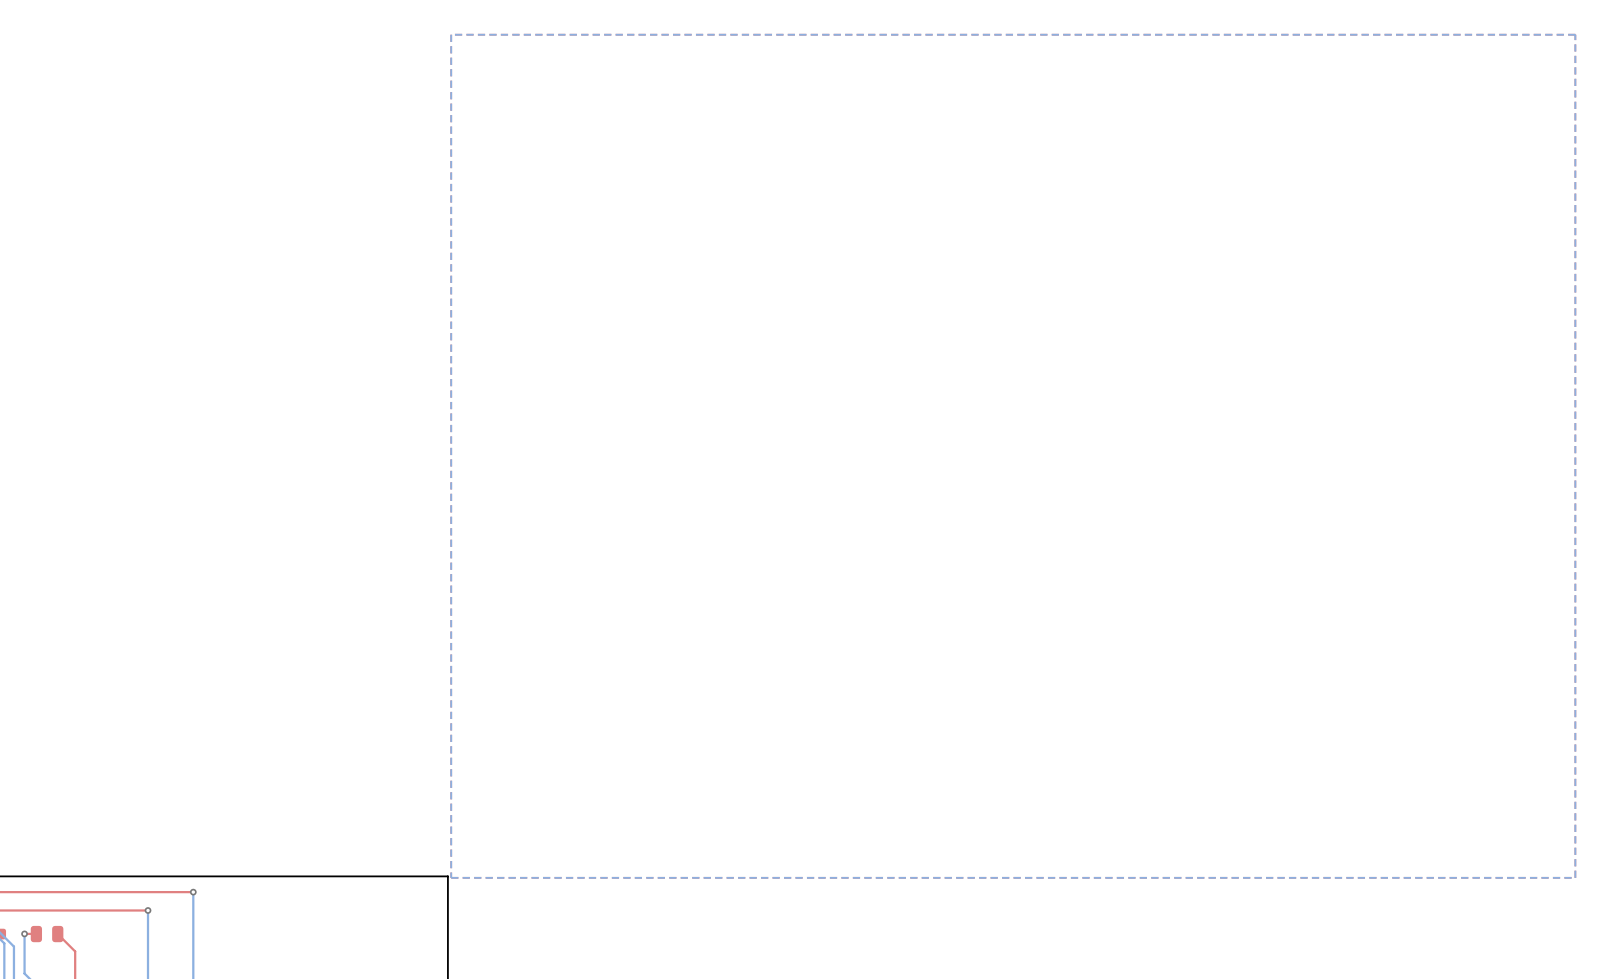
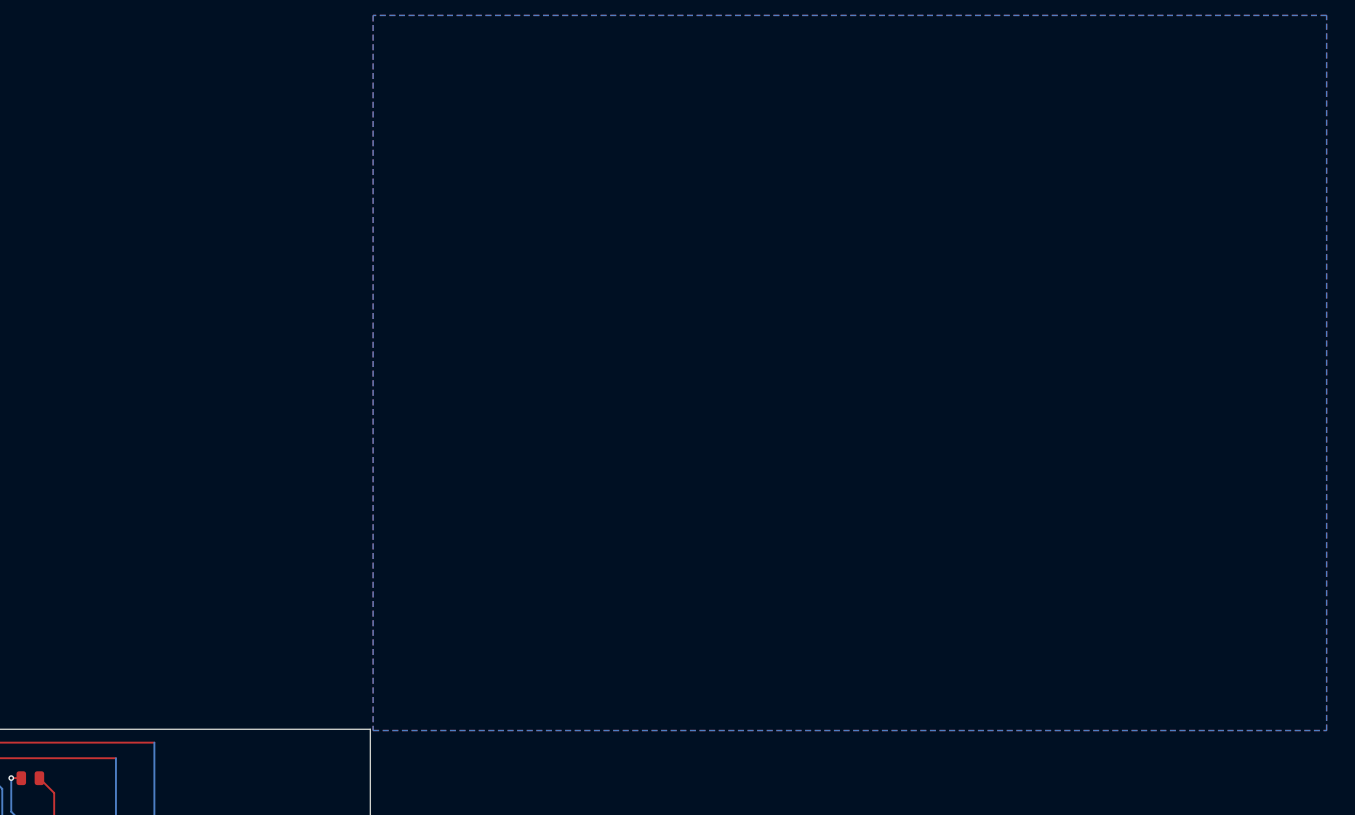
via: (193, 892) -> none
via: (148, 910) -> none

